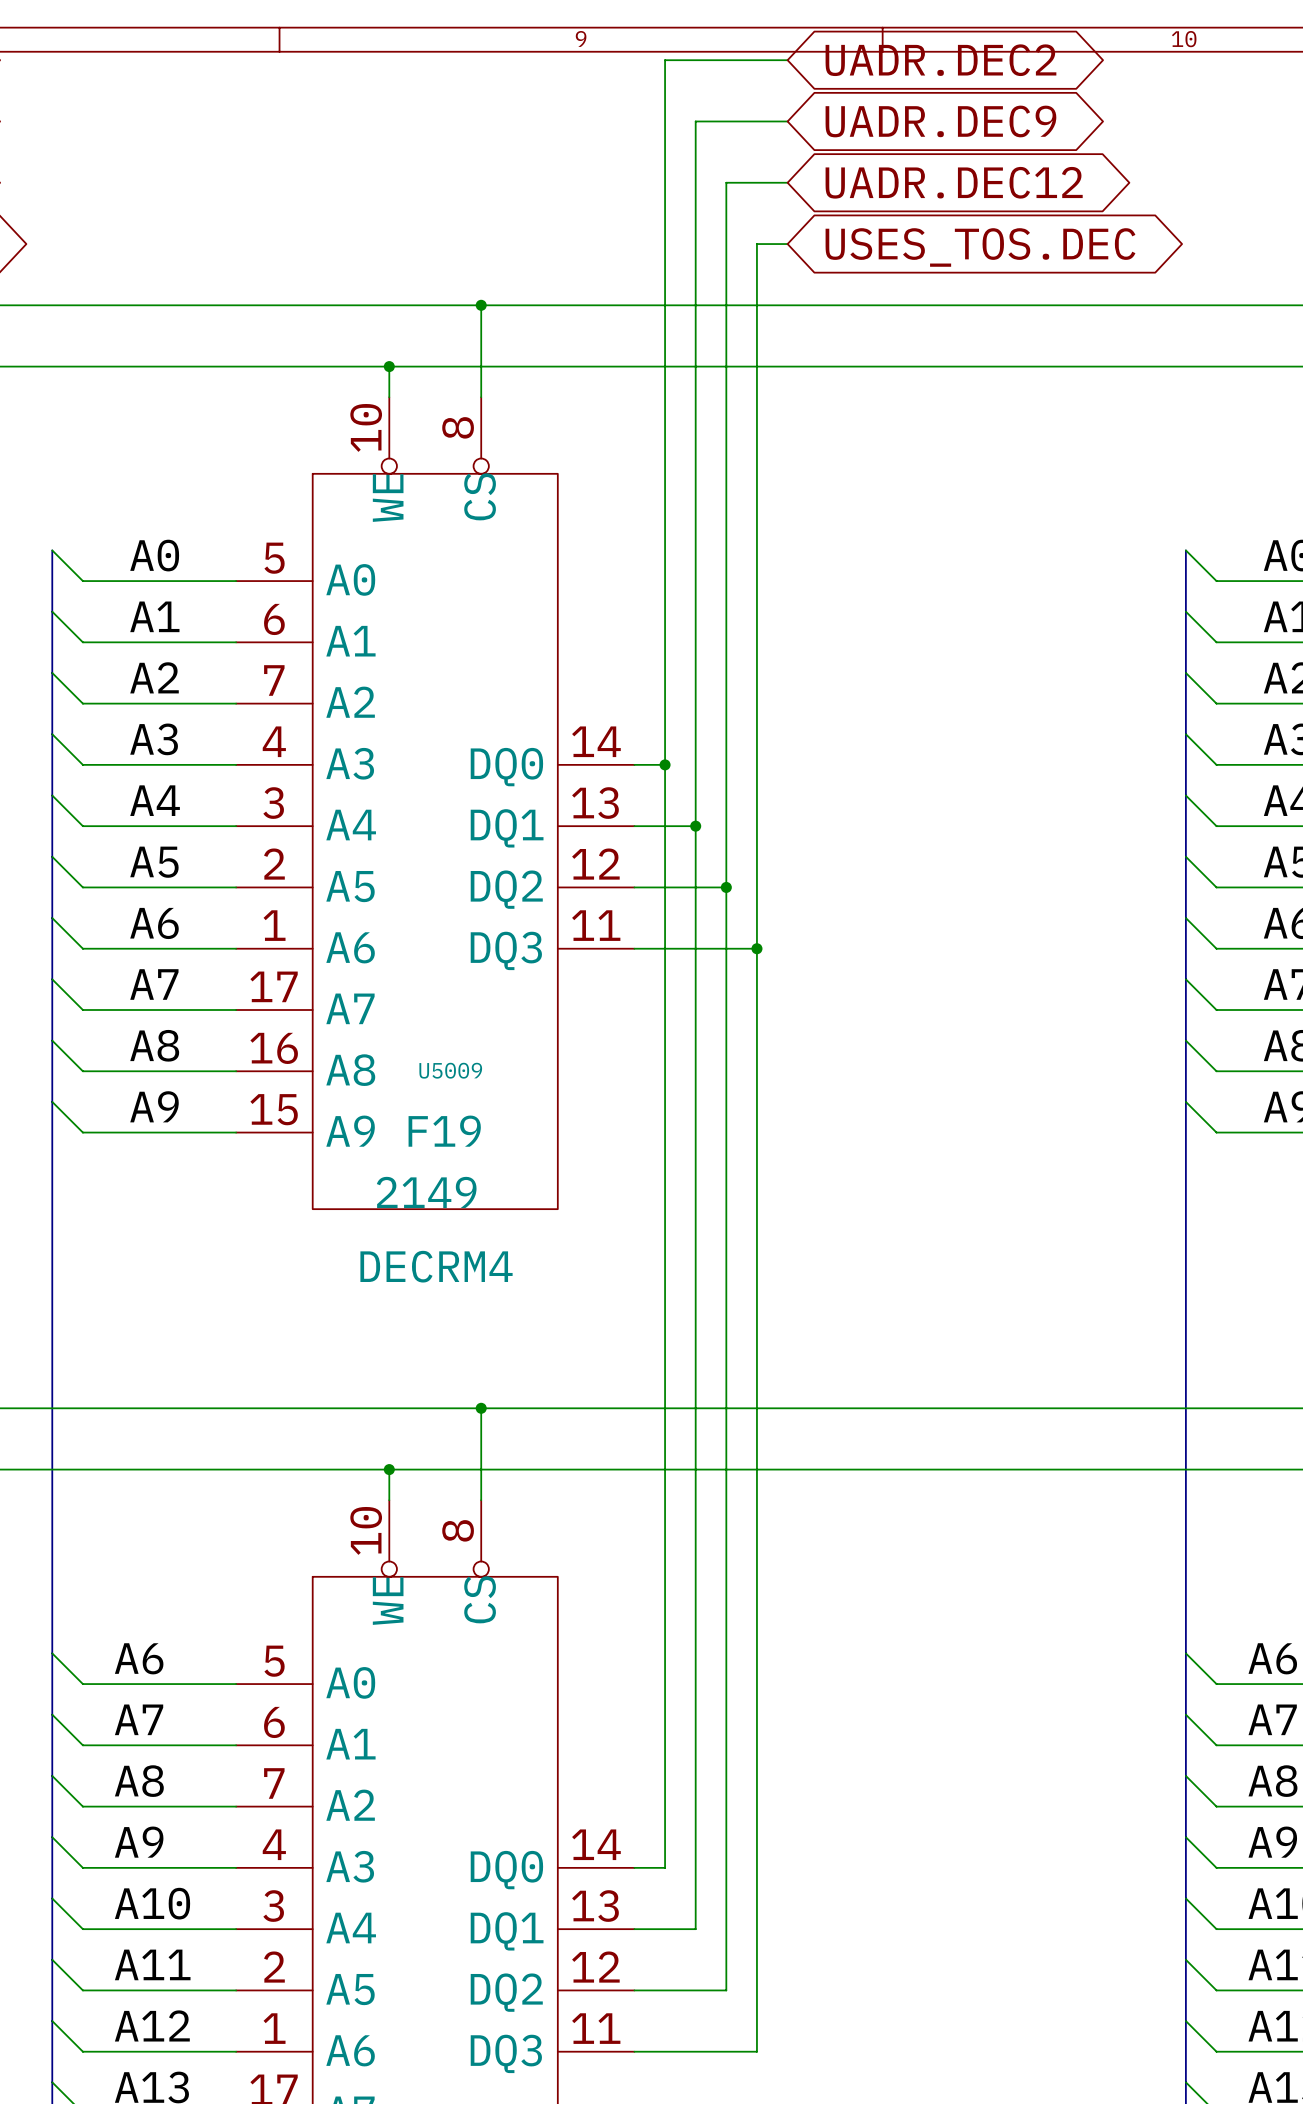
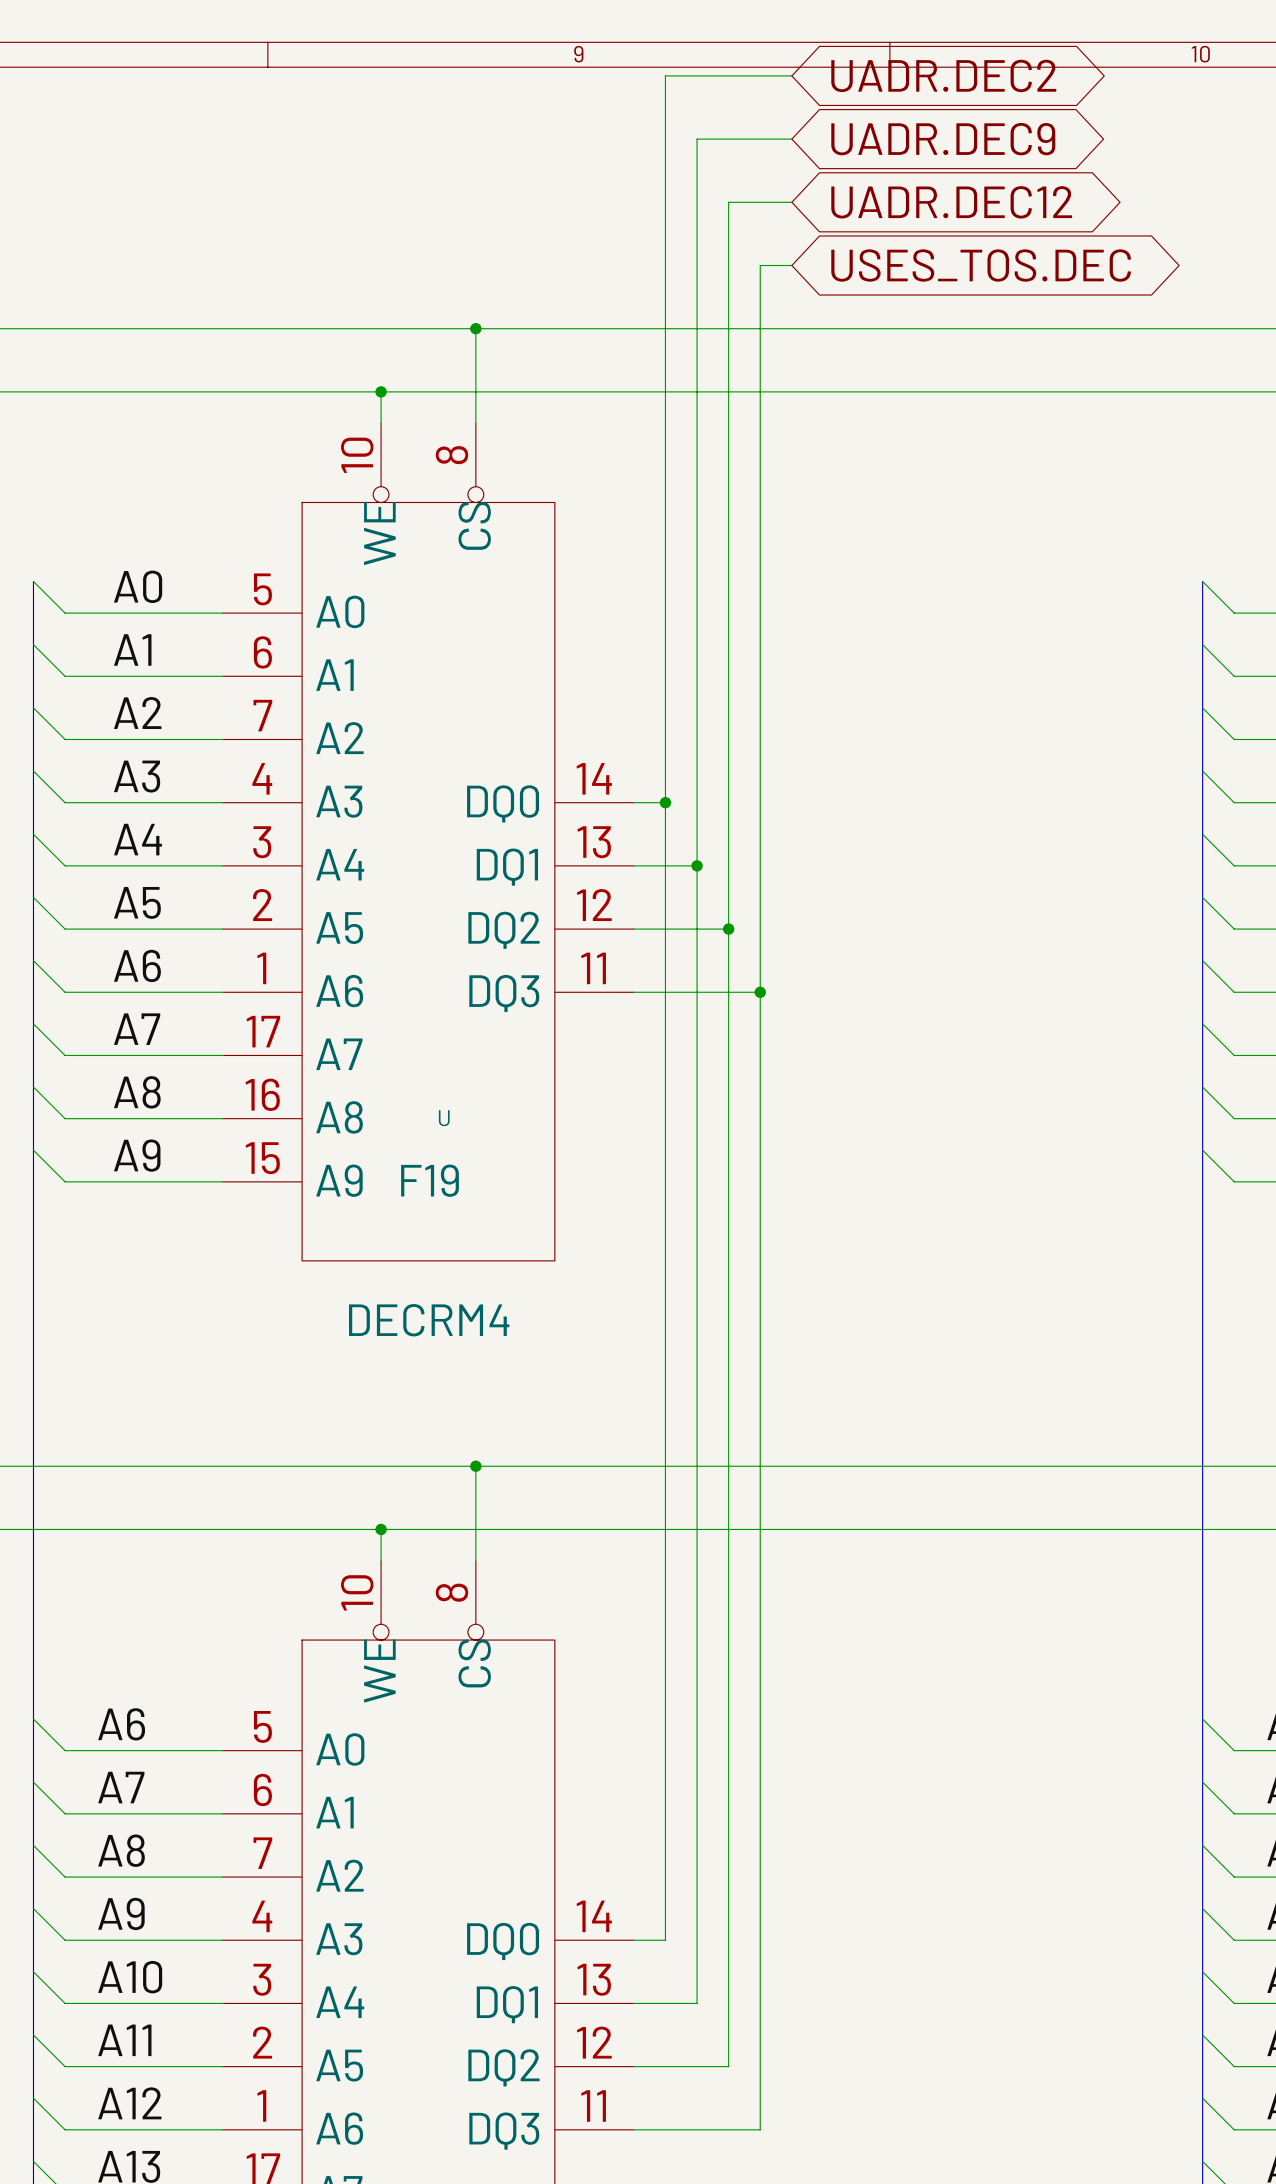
U5009 name: U5009 (450, 1070) -> U (444, 1118)
U5009 value: 2149 (426, 1192) -> none

